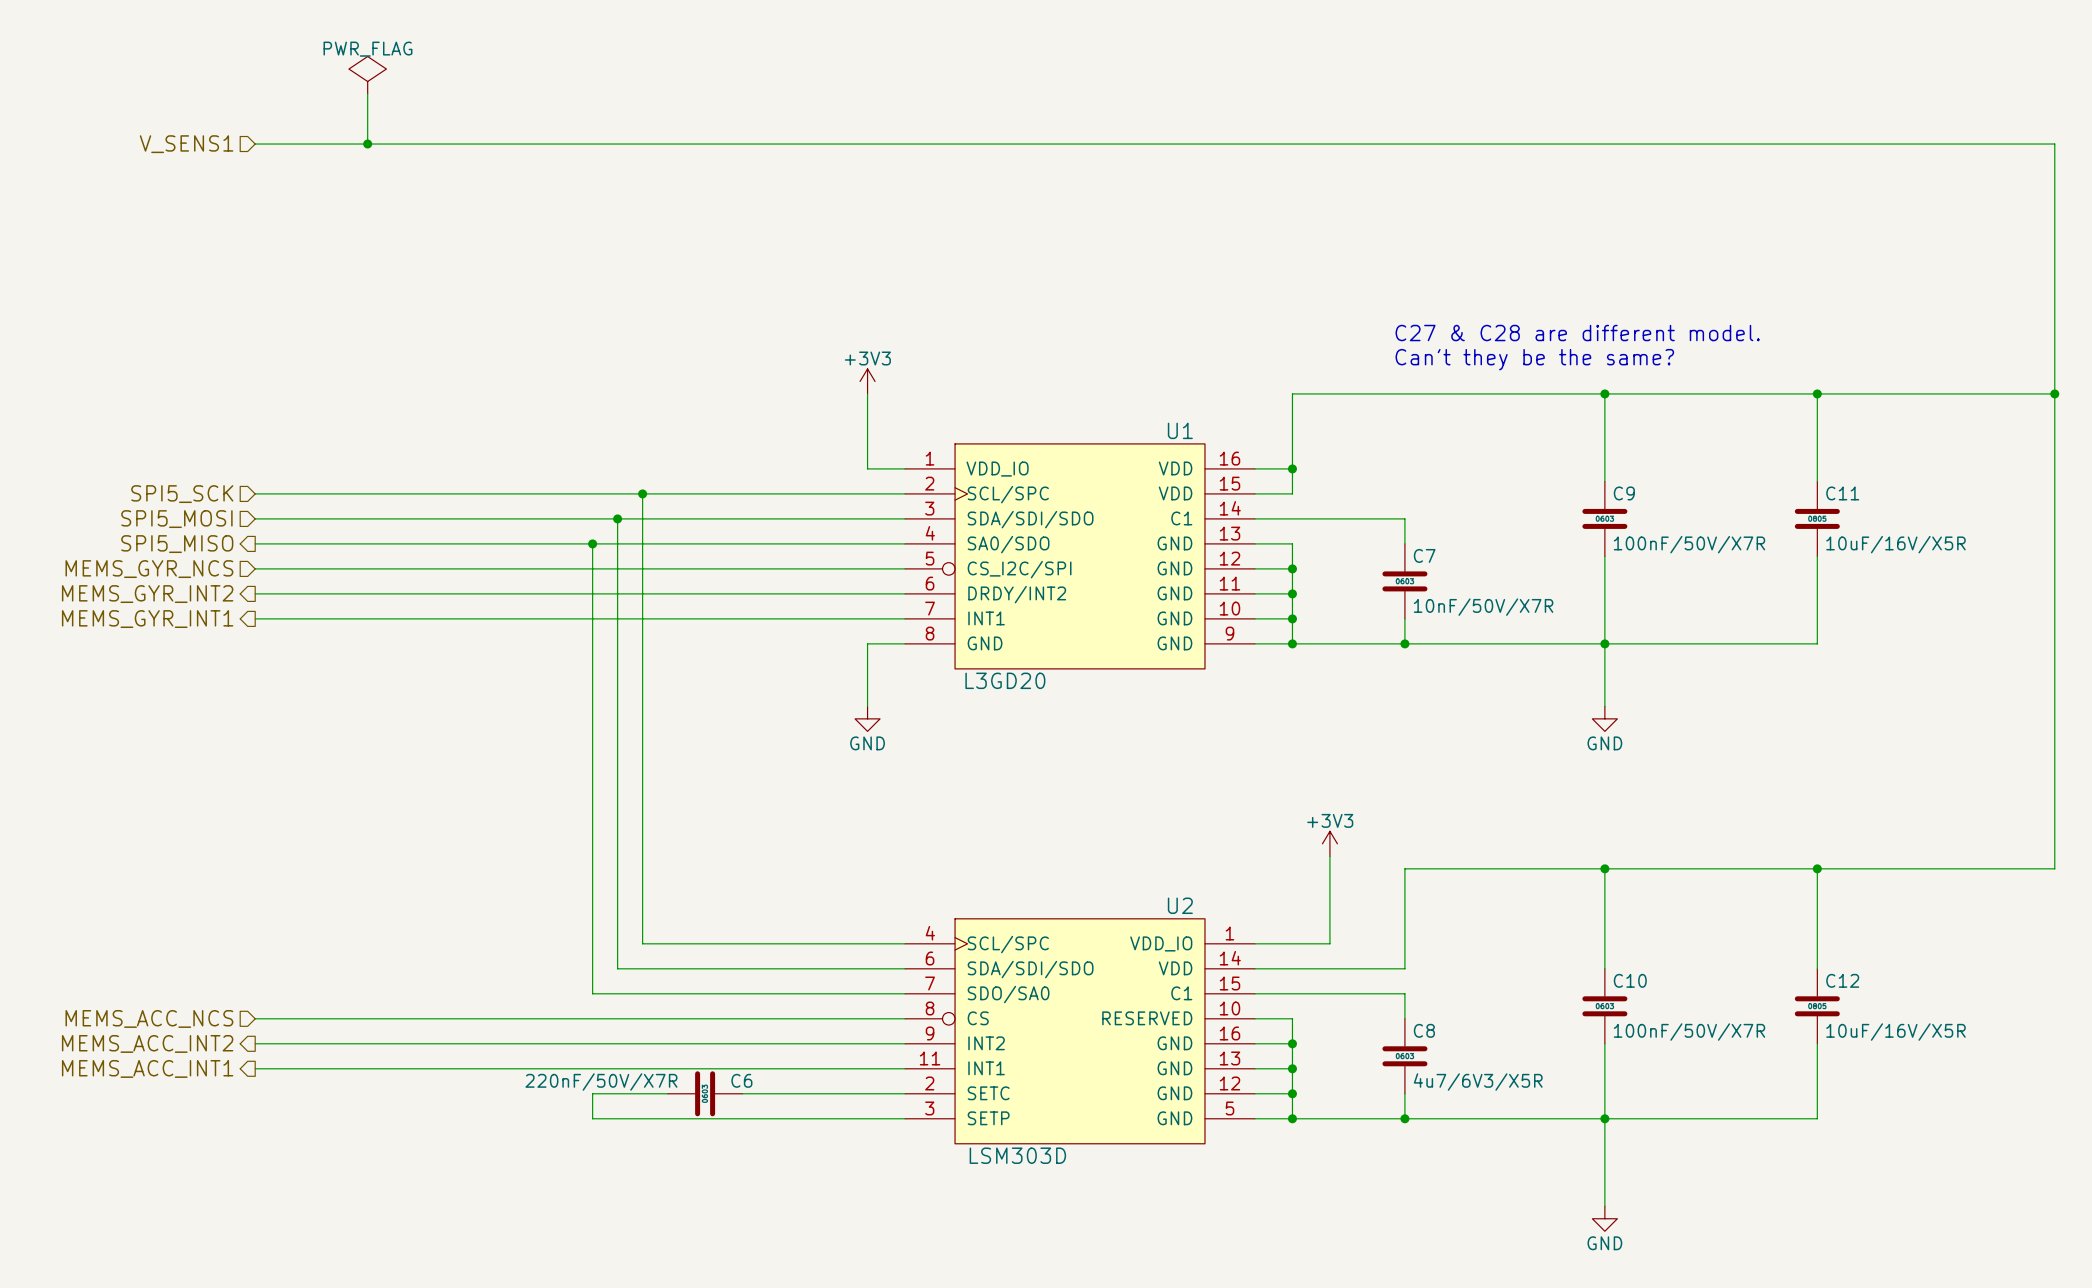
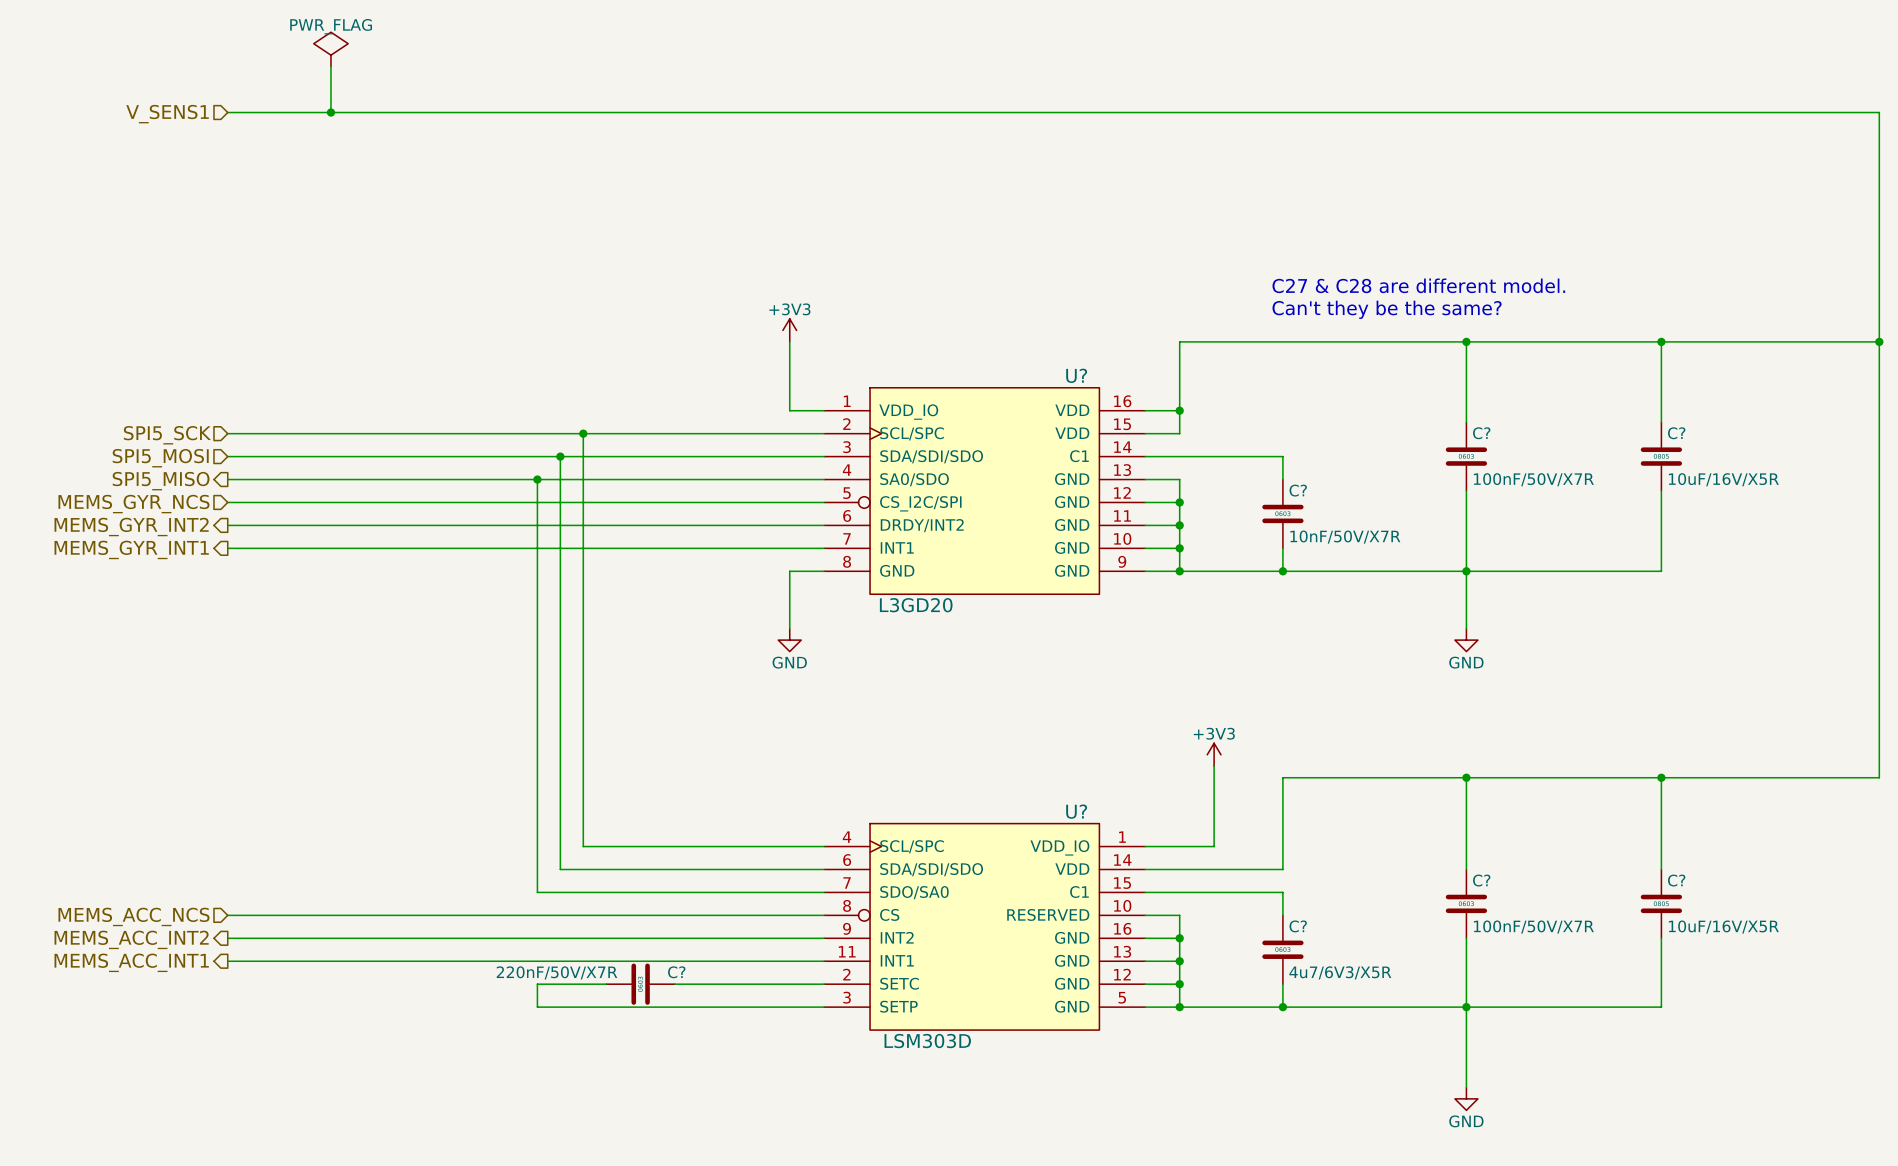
U1 name: U1 (1180, 430) -> U? (1076, 375)
C9 name: C9 (1624, 493) -> C? (1481, 433)
C11 name: C11 (1842, 493) -> C? (1676, 433)
C7 name: C7 (1424, 555) -> C? (1298, 490)
U2 name: U2 (1180, 905) -> U? (1076, 811)
C10 name: C10 (1630, 980) -> C? (1481, 880)
C12 name: C12 (1842, 980) -> C? (1676, 880)
C8 name: C8 (1424, 1030) -> C? (1298, 926)
C6 name: C6 (741, 1080) -> C? (676, 972)

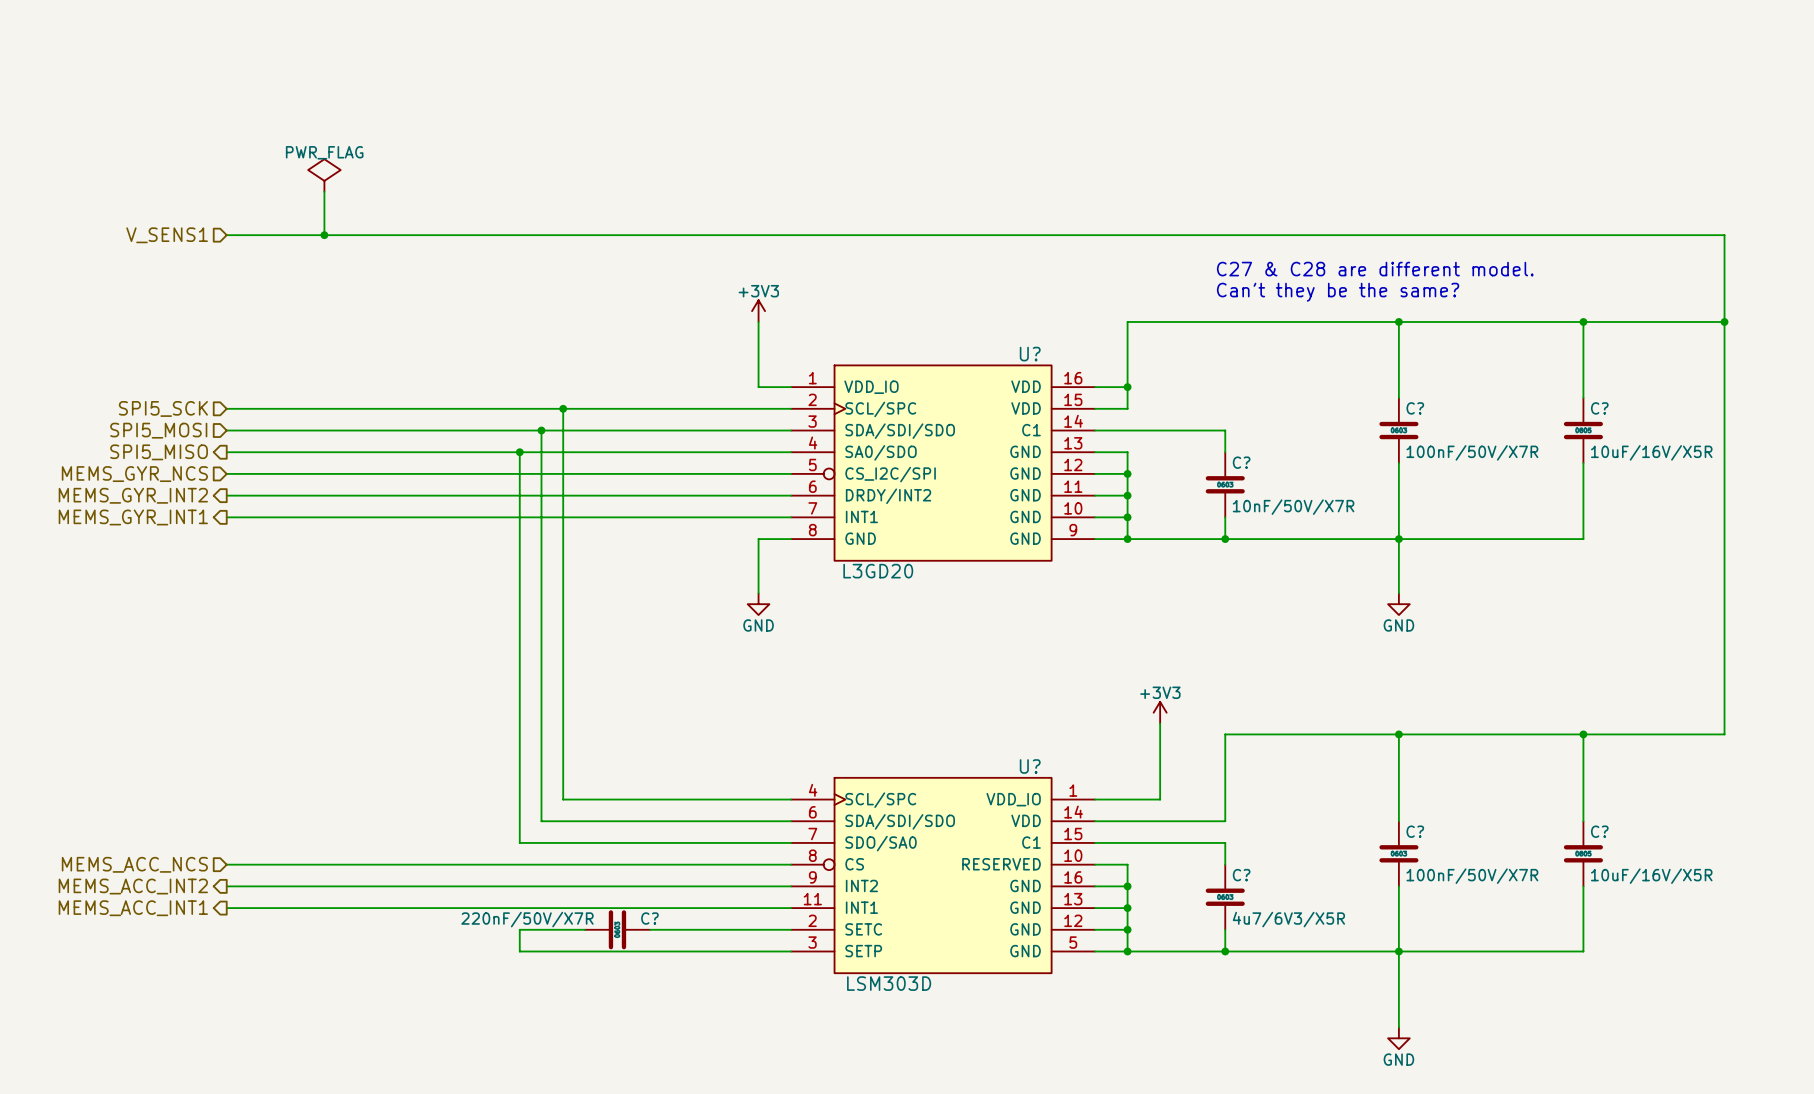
power symbol position: PWR_FLAG (330, 49) -> PWR_FLAG (324, 175)
wire: (330, 66) (330, 112) -> (324, 191) (324, 235)
wire: (227, 112) (1879, 112) (1879, 777) (1810, 777) -> (226, 235) (1724, 235) (1724, 734)
junction: (330, 112) -> none
hierarchical label position: V_SENS1 (167, 114) -> V_SENS1 (167, 235)
junction: none -> (324, 235)
wire: (1810, 341) (1879, 341) -> none
junction: none -> (1724, 321)
junction: (1879, 341) -> none

